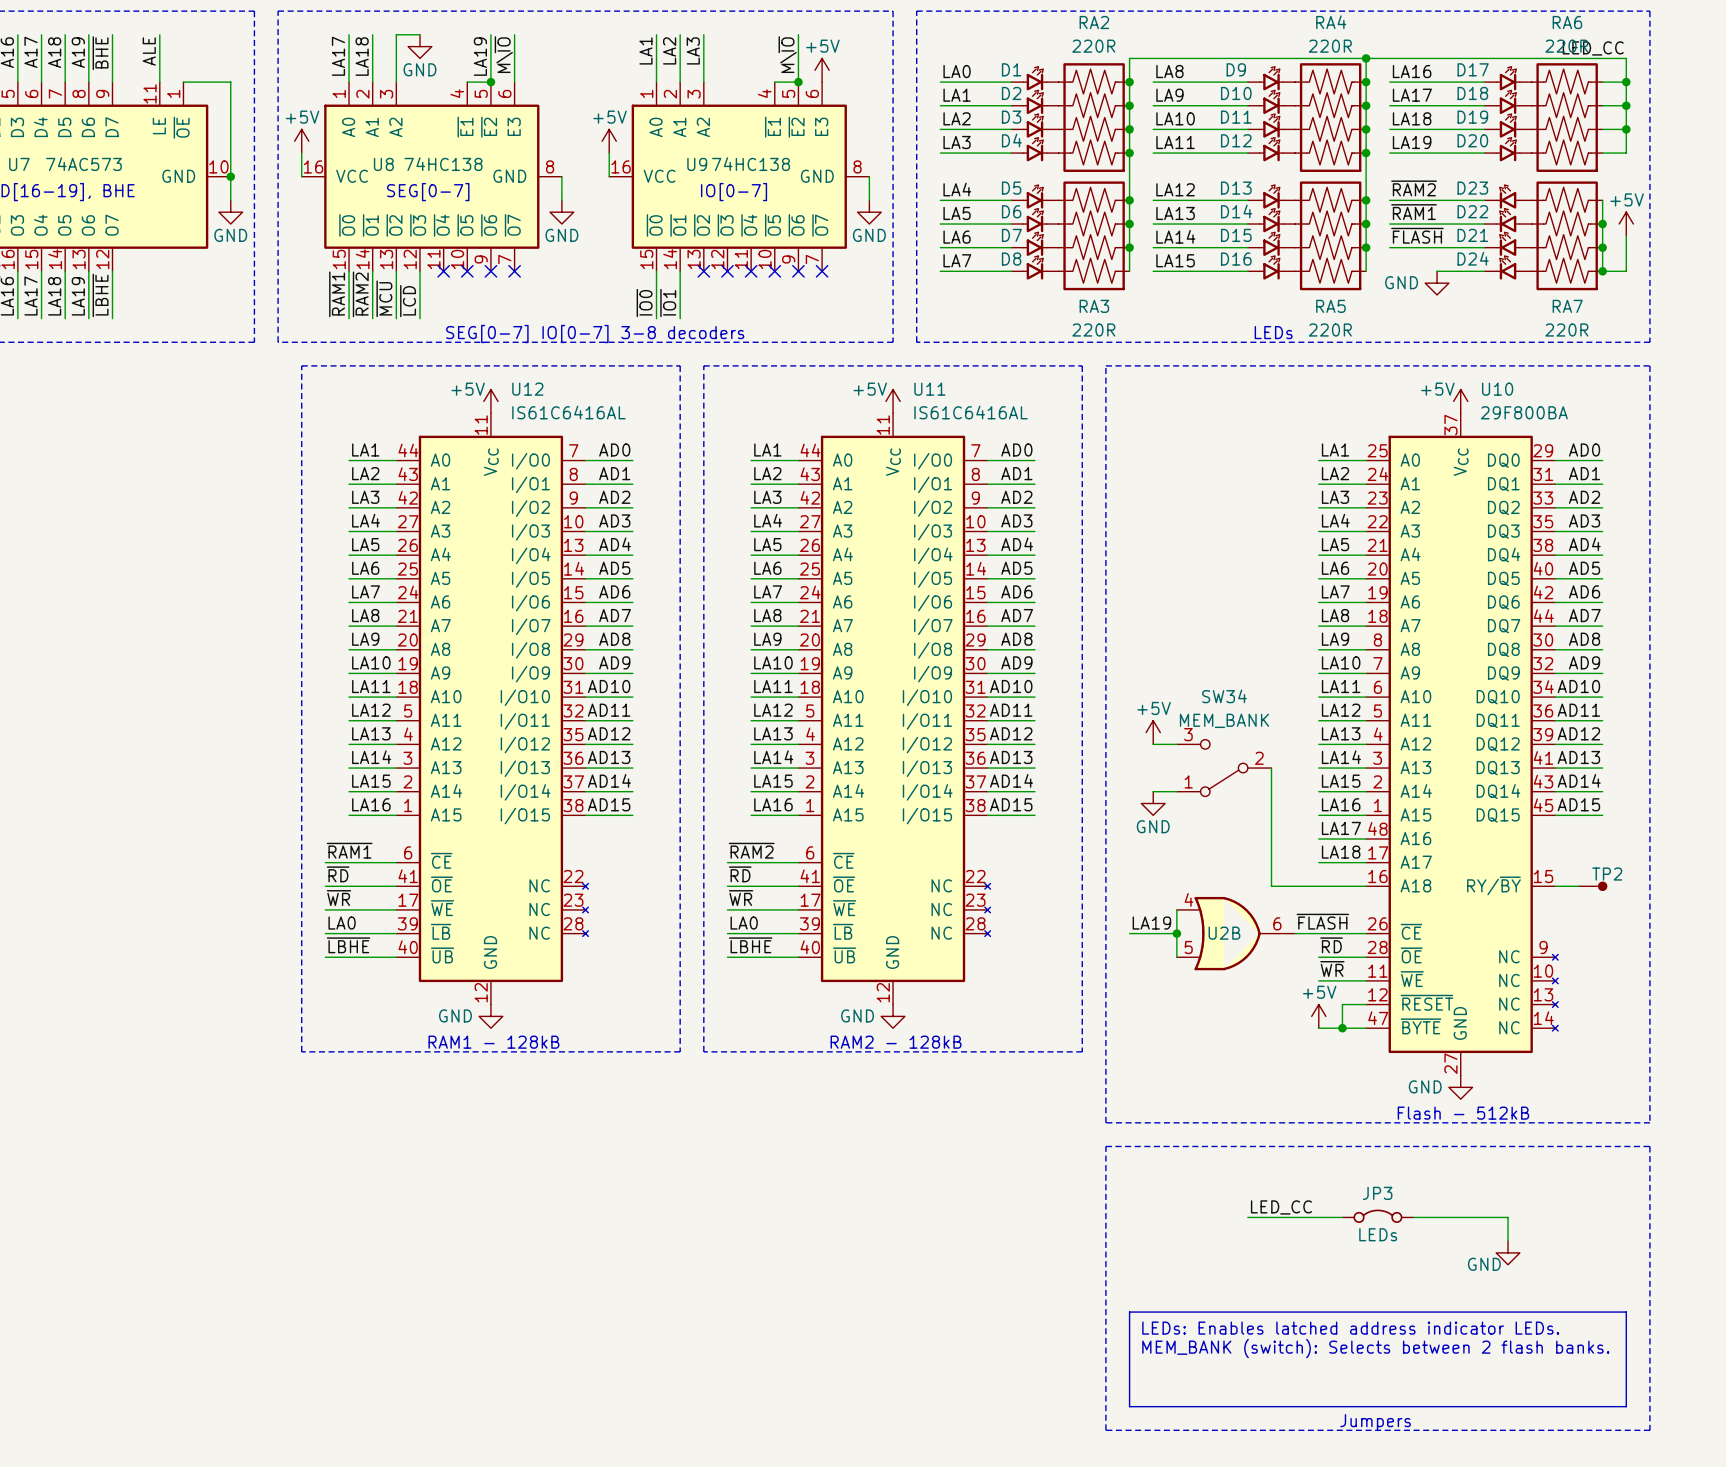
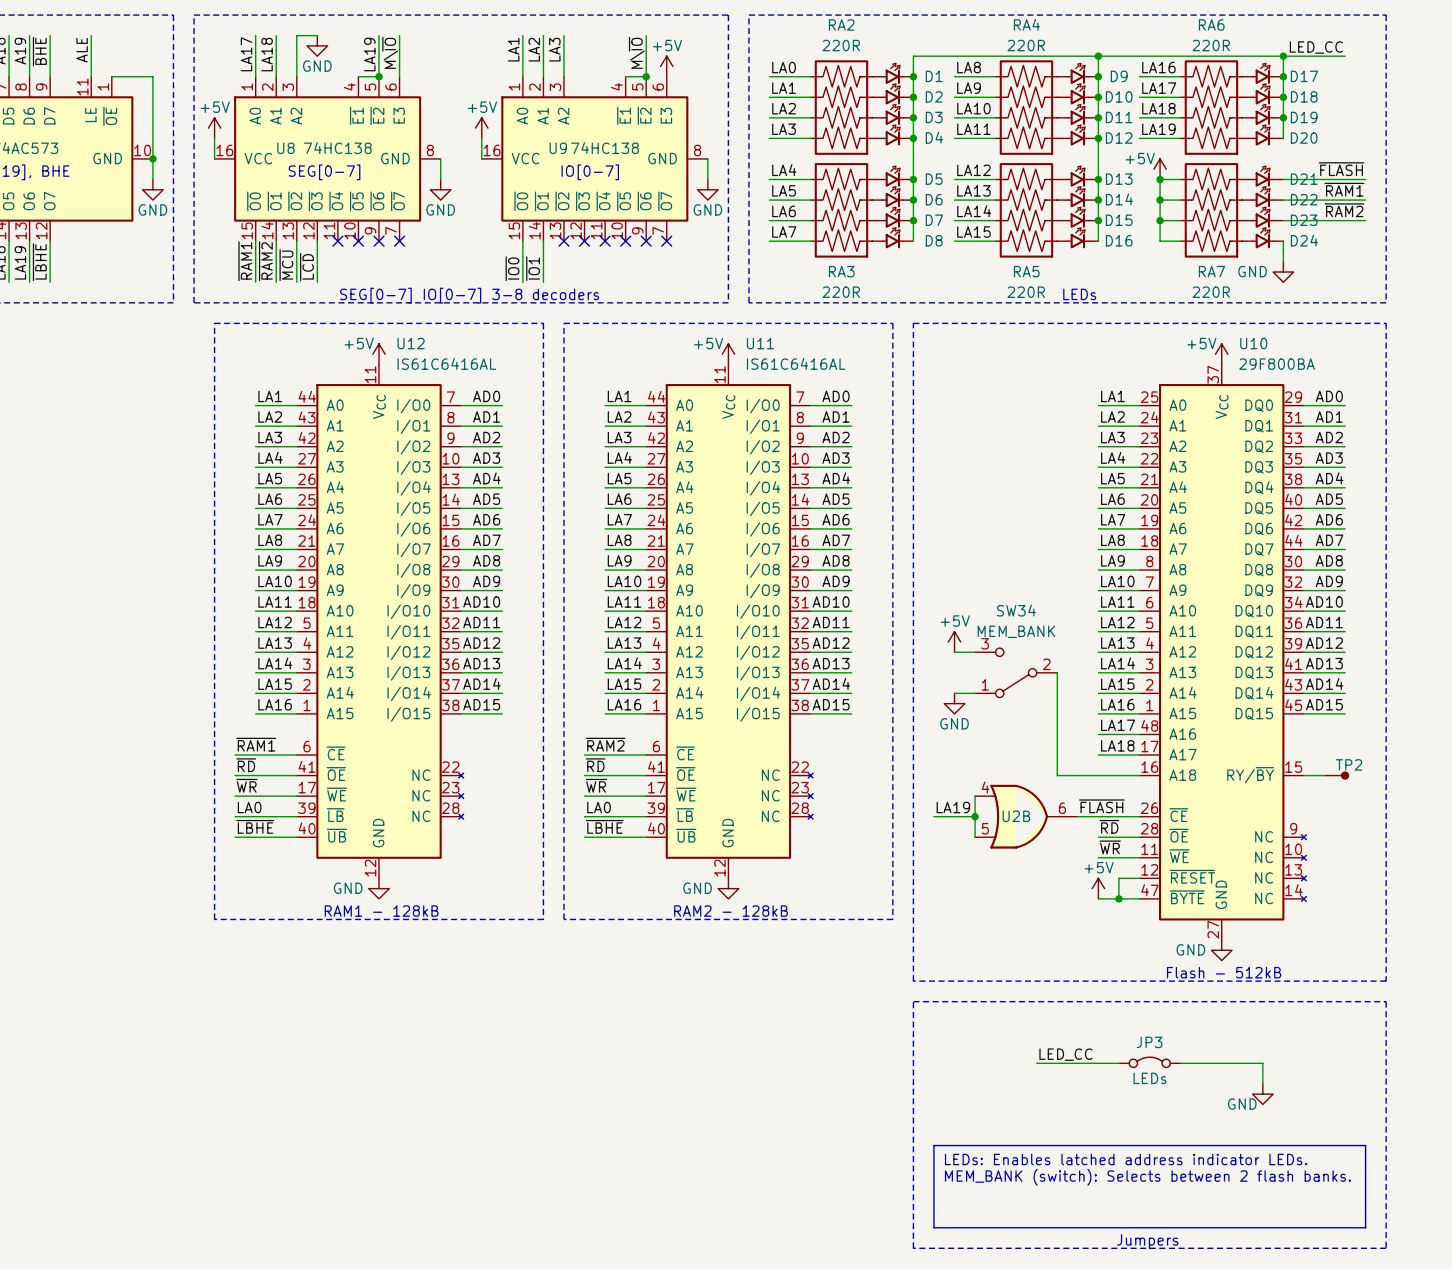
label position: LED_CC (1593, 48) -> LED_CC (1316, 47)
wire: (1129, 58) (1129, 271) -> (933, 56) (913, 56) (913, 241)
junction: none -> (1098, 56)
wire: (1366, 58) (1366, 271) -> (1098, 56) (1098, 241)
junction: (1366, 58) -> none
wire: none -> (1283, 56) (1283, 138)
junction: none -> (1283, 56)
wire: (1602, 58) (1626, 58) (1626, 153) (1602, 153) -> none
D1 name position: D1 (1011, 69) -> D1 (934, 76)
D9 name position: D9 (1236, 69) -> D9 (1119, 76)
D17 name position: D17 (1473, 69) -> D17 (1304, 76)
label position: LA16 (1412, 71) -> LA16 (1158, 67)
D1 position: (1034, 78) -> (892, 73)
D9 position: (1271, 78) -> (1077, 73)
junction: none -> (913, 76)
junction: (1129, 82) -> none
wire: (1200, 82) (1247, 82) -> none
junction: none -> (1098, 76)
wire: none -> (1139, 76) (1160, 76)
junction: (1366, 82) -> none
junction: none -> (1283, 76)
wire: (1602, 82) (1626, 82) -> none
junction: (1626, 82) -> none
D2 name position: D2 (1011, 93) -> D2 (934, 96)
D10 name position: D10 (1236, 93) -> D10 (1119, 96)
D18 name position: D18 (1472, 93) -> D18 (1304, 96)
label position: LA17 (1412, 95) -> LA17 (1159, 88)
D2 position: (1034, 101) -> (892, 94)
D10 position: (1271, 101) -> (1077, 94)
junction: none -> (913, 97)
junction: (1129, 105) -> none
wire: (1200, 105) (1247, 105) -> none
junction: none -> (1098, 97)
wire: none -> (1139, 97) (1160, 97)
junction: (1366, 105) -> none
junction: none -> (1283, 97)
wire: (1602, 105) (1626, 105) -> none
junction: (1626, 105) -> none
D3 name position: D3 (1011, 117) -> D3 (934, 117)
RA2 position: (1094, 117) -> (841, 107)
D11 name position: D11 (1236, 117) -> D11 (1119, 117)
RA4 position: (1330, 117) -> (1026, 107)
D19 name position: D19 (1472, 117) -> D19 (1304, 117)
RA6 position: (1567, 117) -> (1211, 107)
label position: LA18 (1412, 118) -> LA18 (1158, 108)
D3 position: (1034, 125) -> (892, 114)
D11 position: (1271, 125) -> (1077, 114)
junction: none -> (913, 117)
junction: (1129, 129) -> none
wire: (1200, 129) (1247, 129) -> none
junction: none -> (1098, 117)
wire: none -> (1139, 117) (1160, 117)
junction: (1366, 129) -> none
junction: none -> (1283, 117)
wire: (1602, 129) (1626, 129) -> none
junction: (1626, 129) -> none
D4 name position: D4 (1011, 140) -> D4 (934, 137)
D12 name position: D12 (1236, 140) -> D12 (1119, 138)
D20 name position: D20 (1472, 140) -> D20 (1304, 138)
label position: LA19 (1412, 142) -> LA19 (1158, 129)
D4 position: (1034, 149) -> (892, 135)
D12 position: (1271, 149) -> (1077, 135)
junction: none -> (913, 138)
junction: (1129, 153) -> none
wire: (1200, 153) (1247, 153) -> none
junction: none -> (1098, 138)
wire: none -> (1139, 138) (1160, 138)
junction: (1366, 153) -> none
D5 name position: D5 (1011, 188) -> D5 (934, 179)
D13 name position: D13 (1236, 188) -> D13 (1119, 179)
power symbol: none -> +5V (1160, 169)
label: ~{RAM2} (1414, 188) -> none
label: none -> ~{FLASH} (1341, 169)
D5 position: (1034, 196) -> (892, 176)
D13 position: (1271, 196) -> (1077, 176)
D23 flip: as is (1508, 196) -> left-right (1262, 217)
D23 position: (1508, 196) -> (1262, 217)
junction: none -> (913, 179)
junction: (1129, 200) -> none
wire: (1200, 200) (1247, 200) -> none
junction: none -> (1098, 179)
junction: (1366, 200) -> none
wire: none -> (1160, 179) (1160, 241) (1180, 241)
junction: none -> (1160, 179)
wire: none -> (1283, 179) (1365, 179)
wire: (1602, 200) (1602, 271) (1626, 271) (1626, 235) -> none
D6 name position: D6 (1011, 211) -> D6 (934, 199)
D14 name position: D14 (1236, 211) -> D14 (1119, 199)
label: ~{RAM1} (1414, 212) -> none
label: none -> ~{RAM1} (1344, 189)
D6 position: (1034, 220) -> (892, 196)
D14 position: (1271, 220) -> (1077, 196)
D22 flip: as is (1508, 220) -> left-right (1262, 196)
junction: none -> (913, 200)
junction: (1129, 224) -> none
wire: (1200, 224) (1247, 224) -> none
junction: none -> (1098, 200)
junction: (1366, 224) -> none
junction: none -> (1160, 200)
wire: none -> (1283, 200) (1365, 200)
junction: (1602, 224) -> none
power symbol: +5V (1626, 224) -> none
D7 name position: D7 (1011, 235) -> D7 (934, 220)
RA3 position: (1094, 235) -> (841, 210)
D15 name position: D15 (1236, 235) -> D15 (1119, 220)
RA5 position: (1330, 235) -> (1026, 210)
label: ~{FLASH} (1417, 235) -> none
RA7 position: (1567, 235) -> (1211, 210)
label: none -> ~{RAM2} (1344, 210)
D7 position: (1034, 243) -> (892, 217)
D15 position: (1271, 243) -> (1077, 217)
D21 flip: as is (1508, 243) -> left-right (1262, 176)
D21 position: (1508, 243) -> (1262, 176)
junction: none -> (913, 220)
junction: (1129, 247) -> none
wire: (1200, 247) (1247, 247) -> none
junction: none -> (1098, 220)
junction: (1366, 247) -> none
junction: none -> (1160, 220)
wire: none -> (1283, 220) (1365, 220)
junction: (1602, 247) -> none
D8 name position: D8 (1011, 259) -> D8 (934, 240)
D16 name position: D16 (1236, 259) -> D16 (1119, 240)
D8 position: (1034, 267) -> (892, 237)
D16 position: (1271, 267) -> (1077, 237)
D24 flip: as is (1508, 267) -> left-right (1262, 237)
wire: (1200, 271) (1247, 271) -> none
wire: (1437, 271) (1484, 271) -> none
wire: none -> (1283, 241) (1283, 261)
junction: (1602, 271) -> none
power symbol position: GND (1437, 283) -> GND (1283, 272)
text position: LEDs (1273, 332) -> LEDs (1079, 294)

